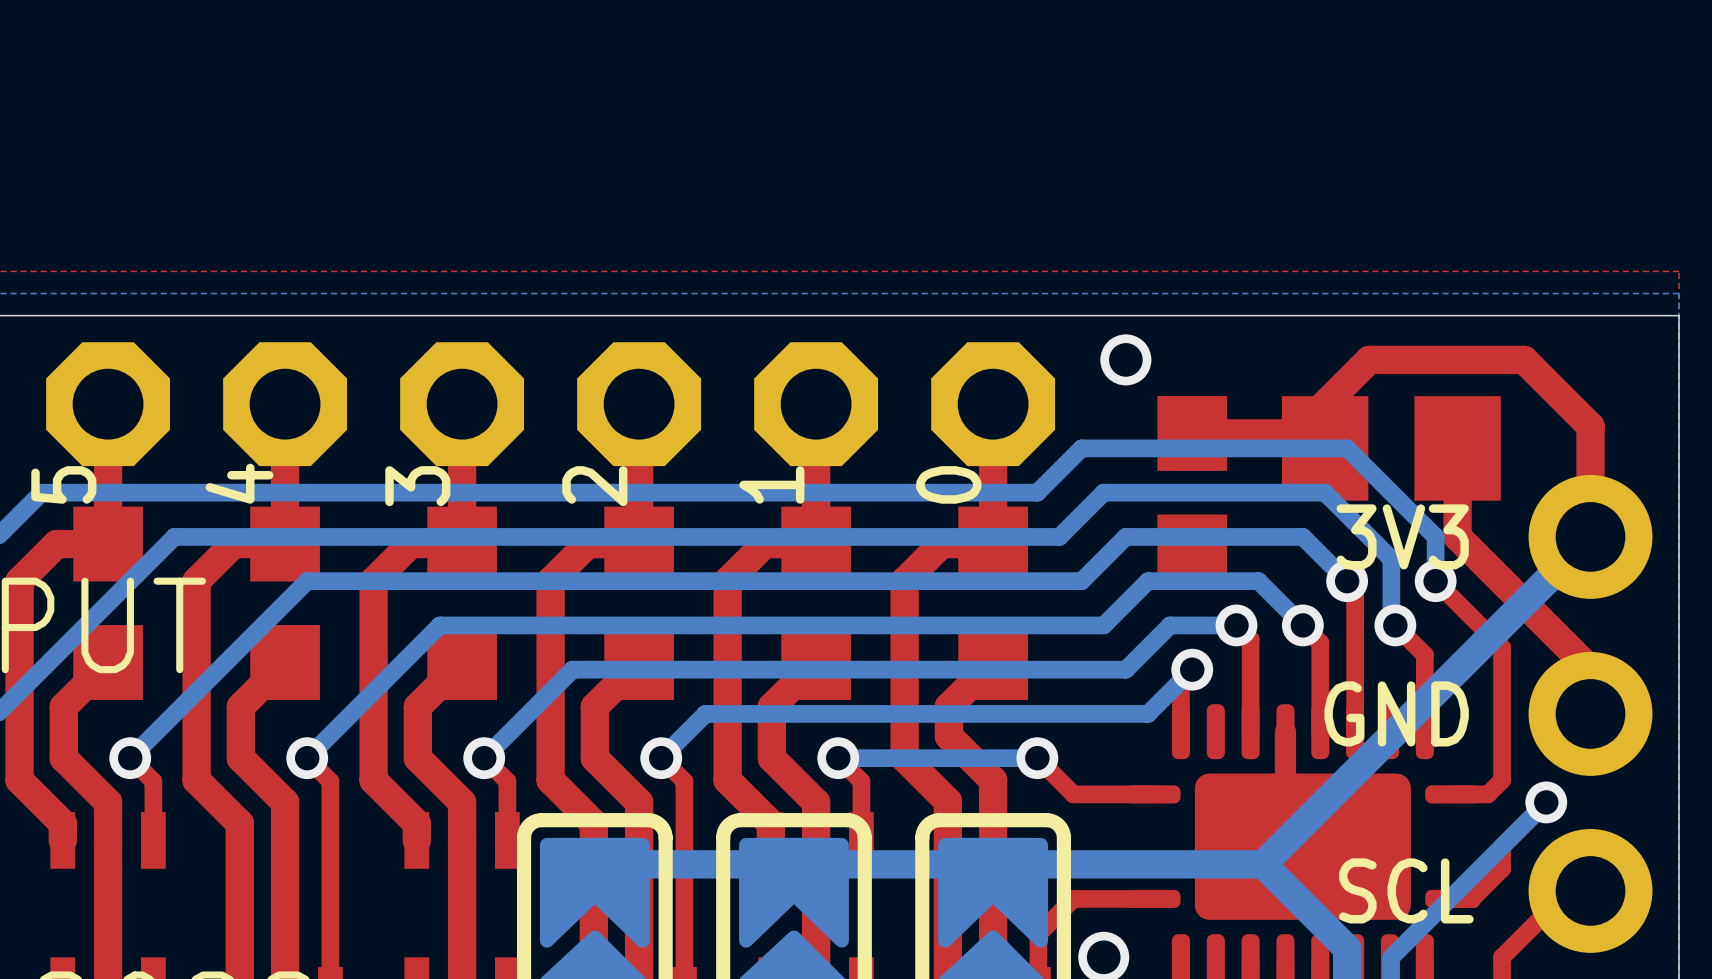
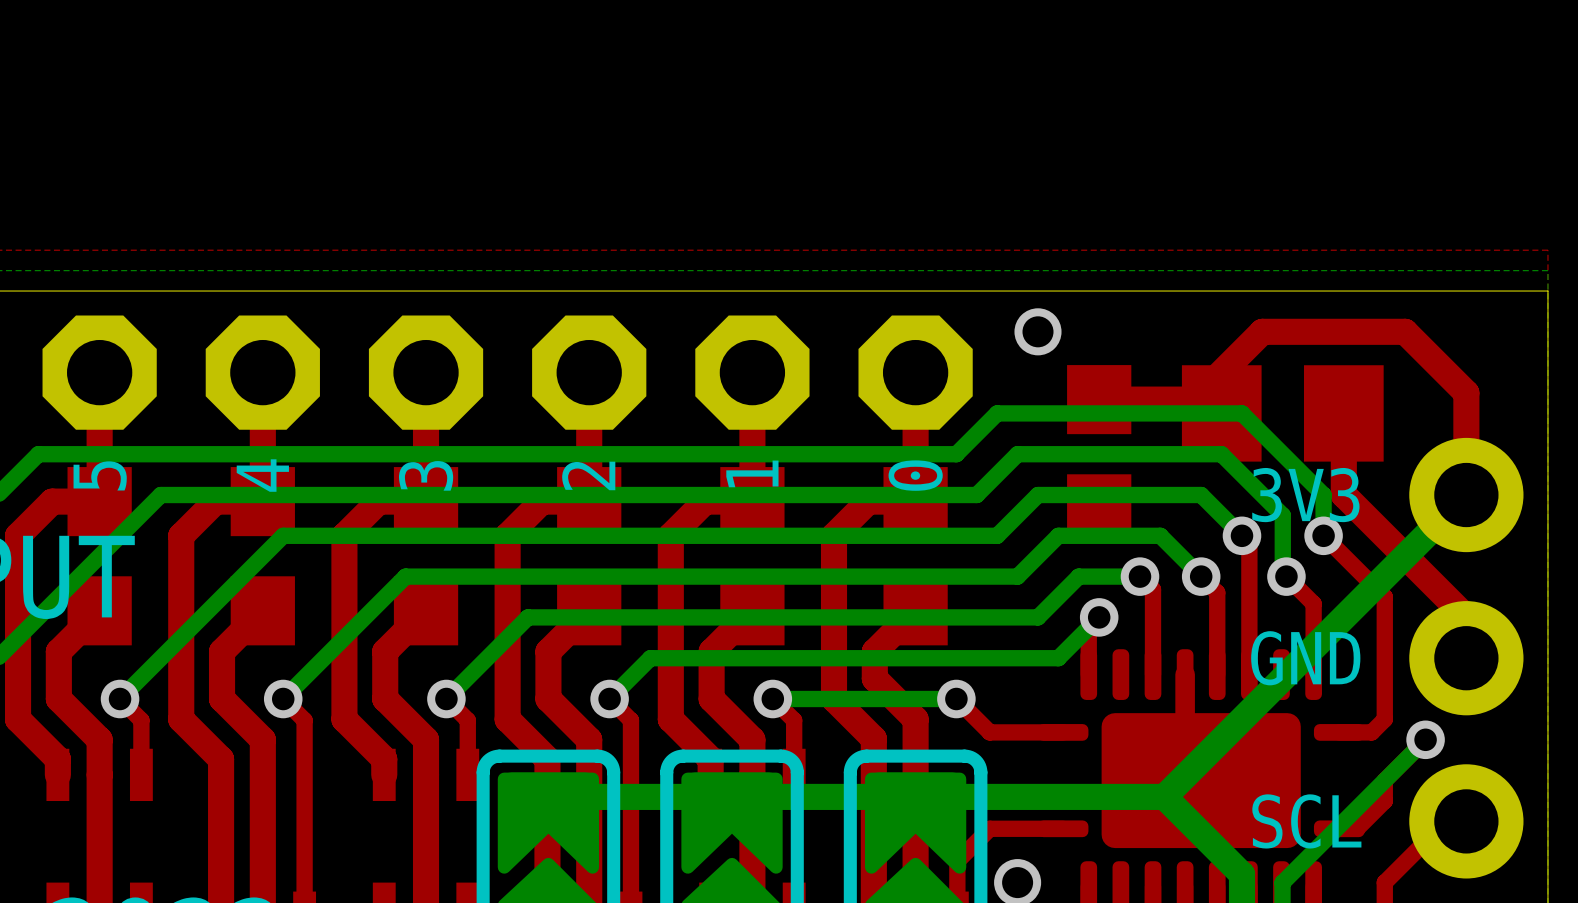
text position: 4 (239, 483) -> 4 (262, 475)
text position: 5 (63, 484) -> 5 (100, 475)
text position: 1 (771, 484) -> 1 (752, 473)
text position: 0 (948, 484) -> 0 (915, 475)
text position: 3 (417, 486) -> 3 (426, 475)
text position: 2 (594, 486) -> 2 (588, 475)

